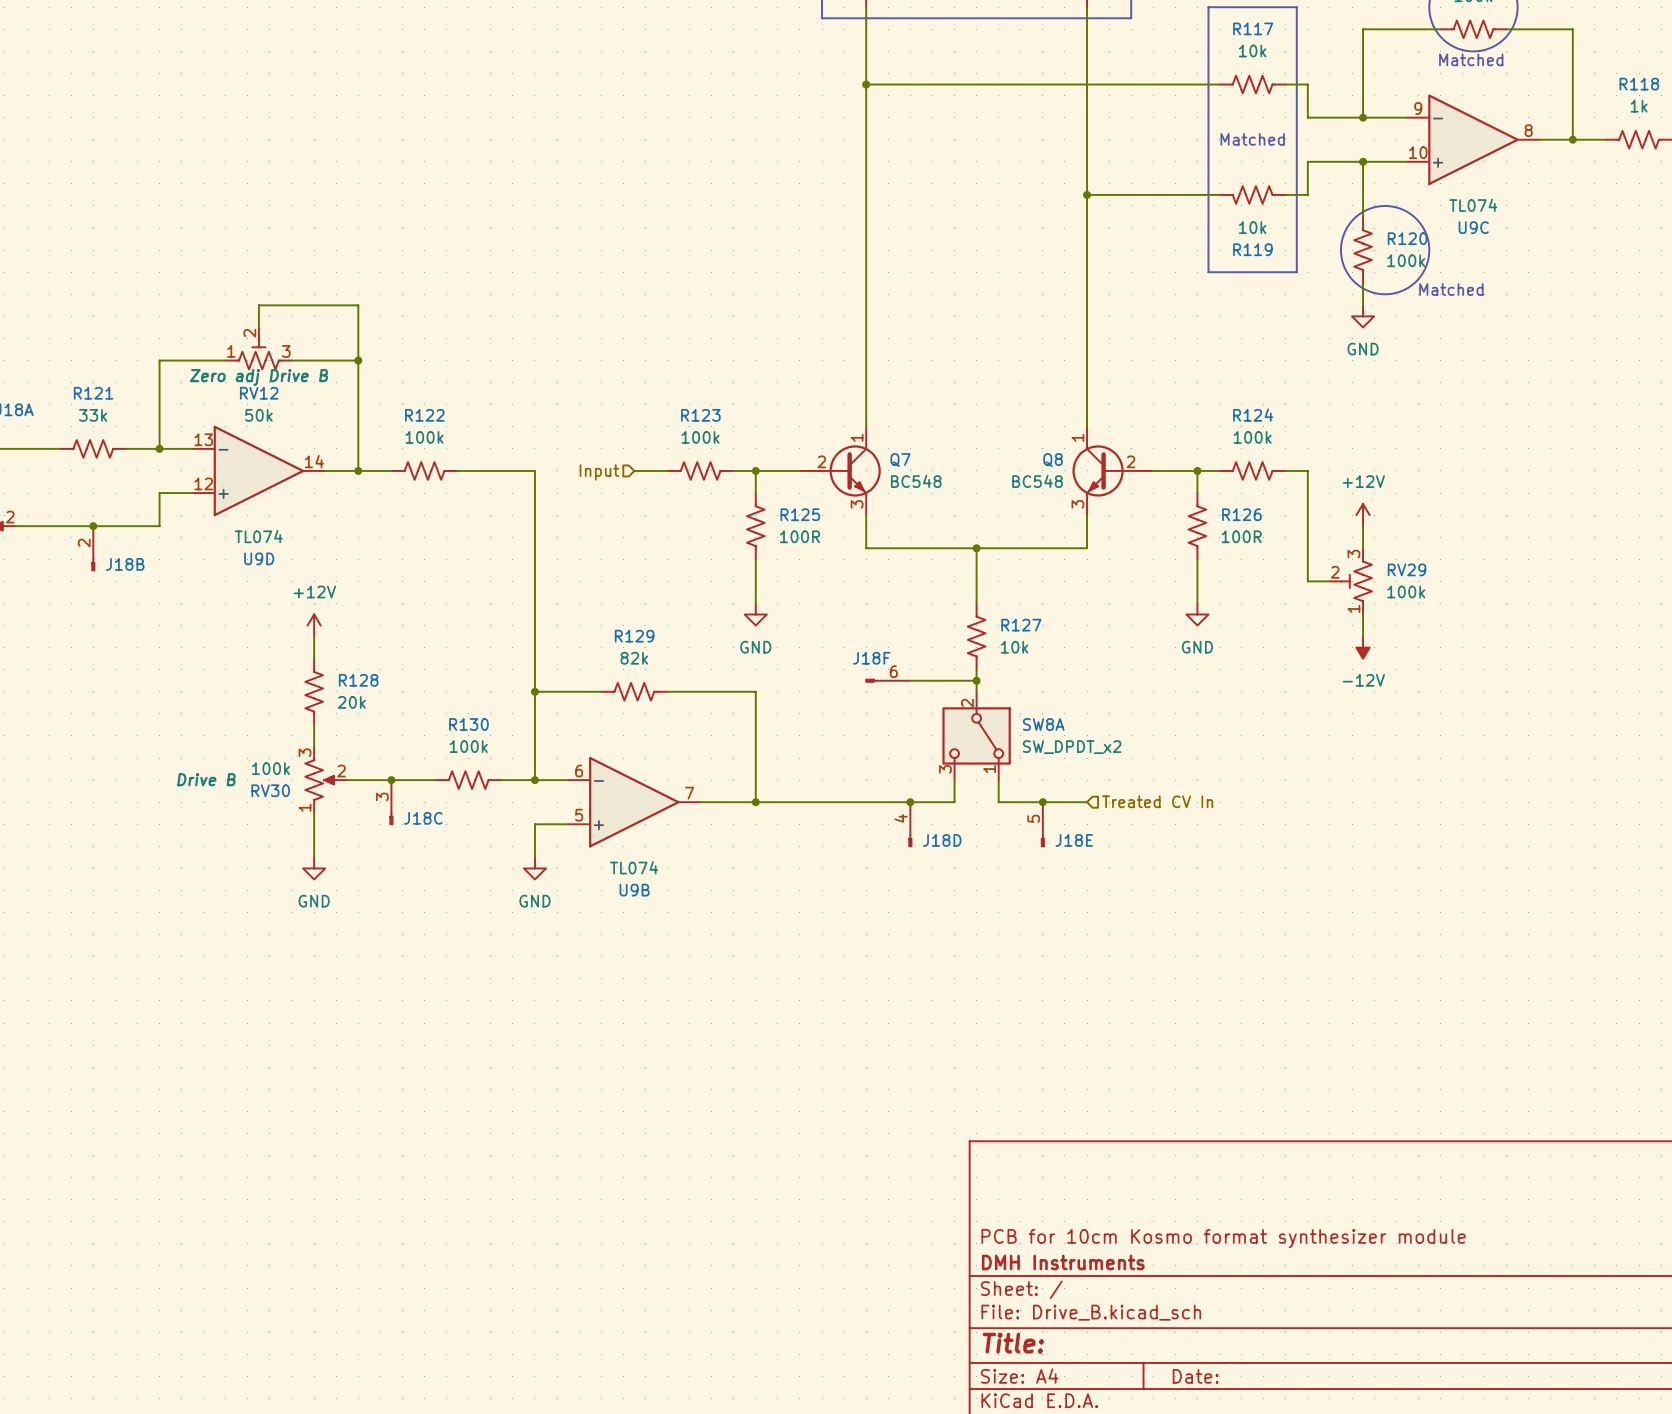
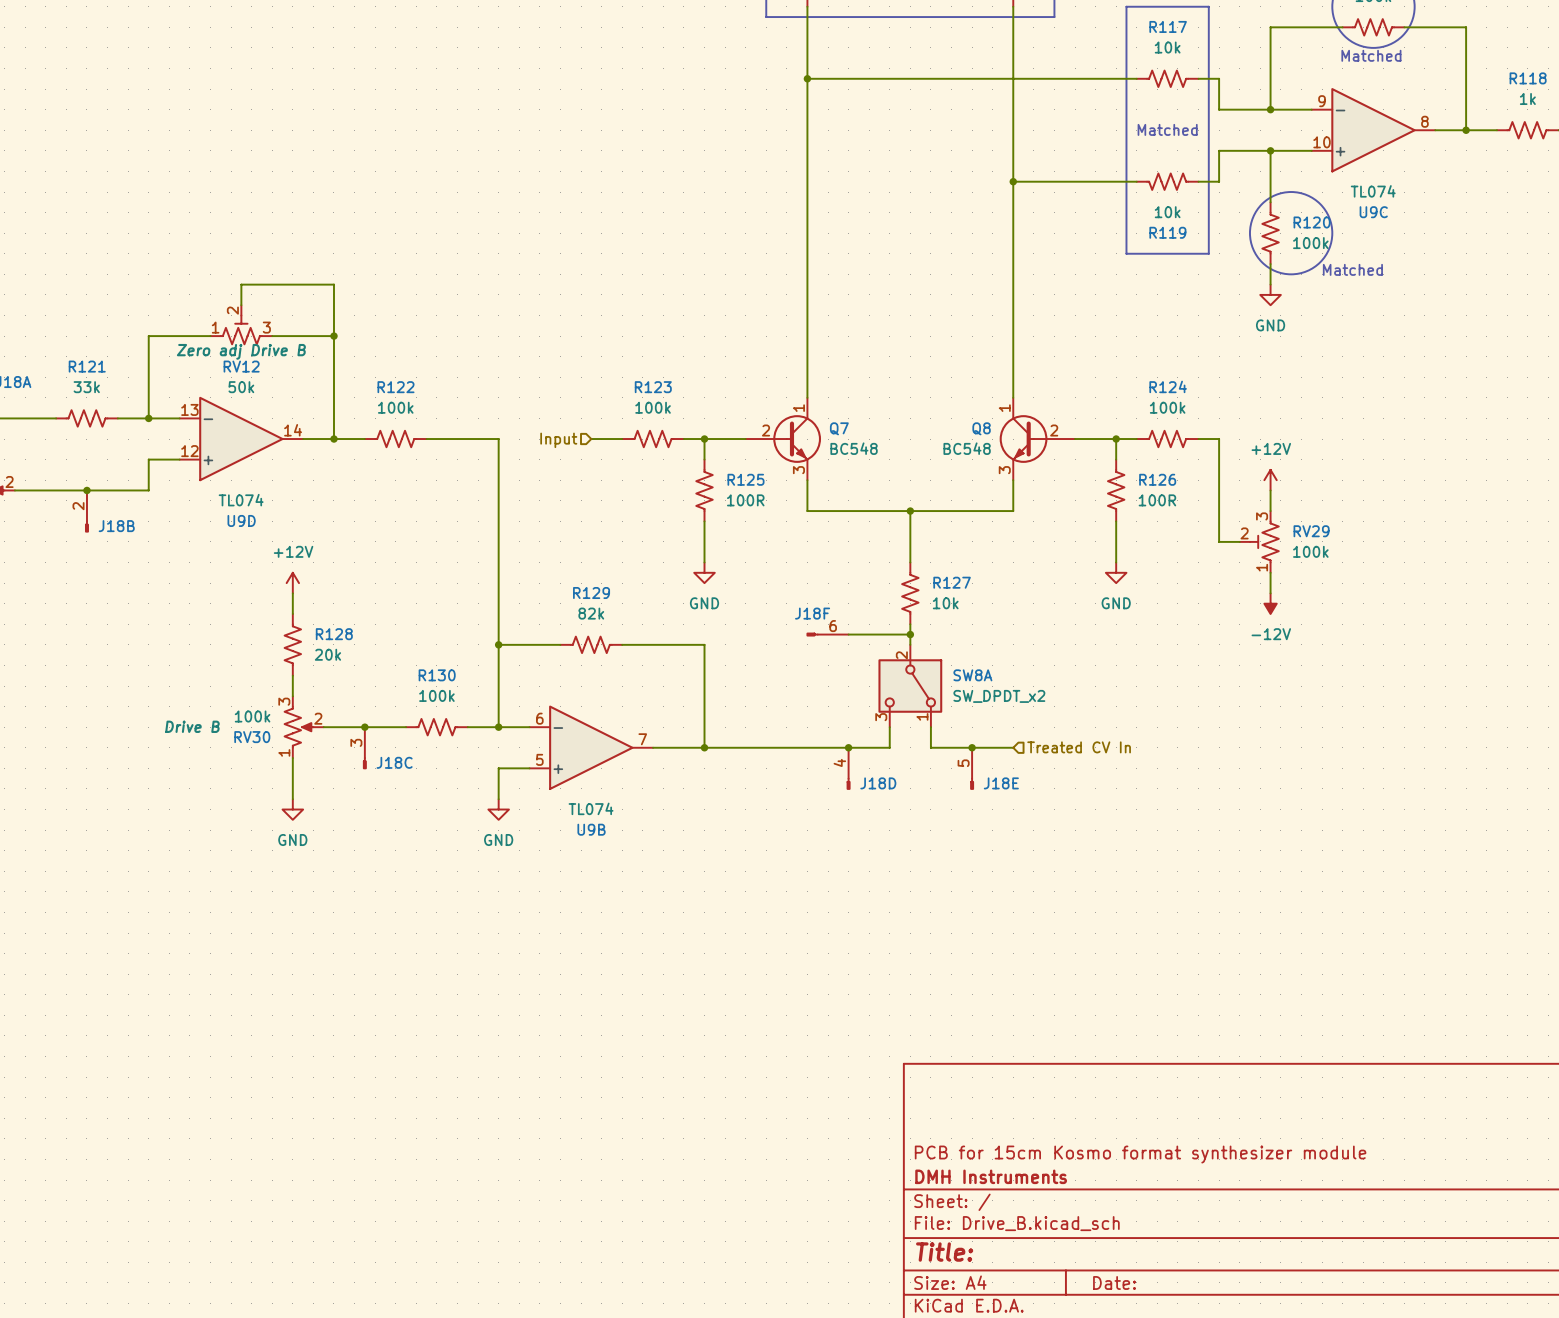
title block: PCB for 10cm Kosmo format synthesizer module (1223, 1238) -> PCB for 15cm Kosmo format synthesizer module (1140, 1154)

